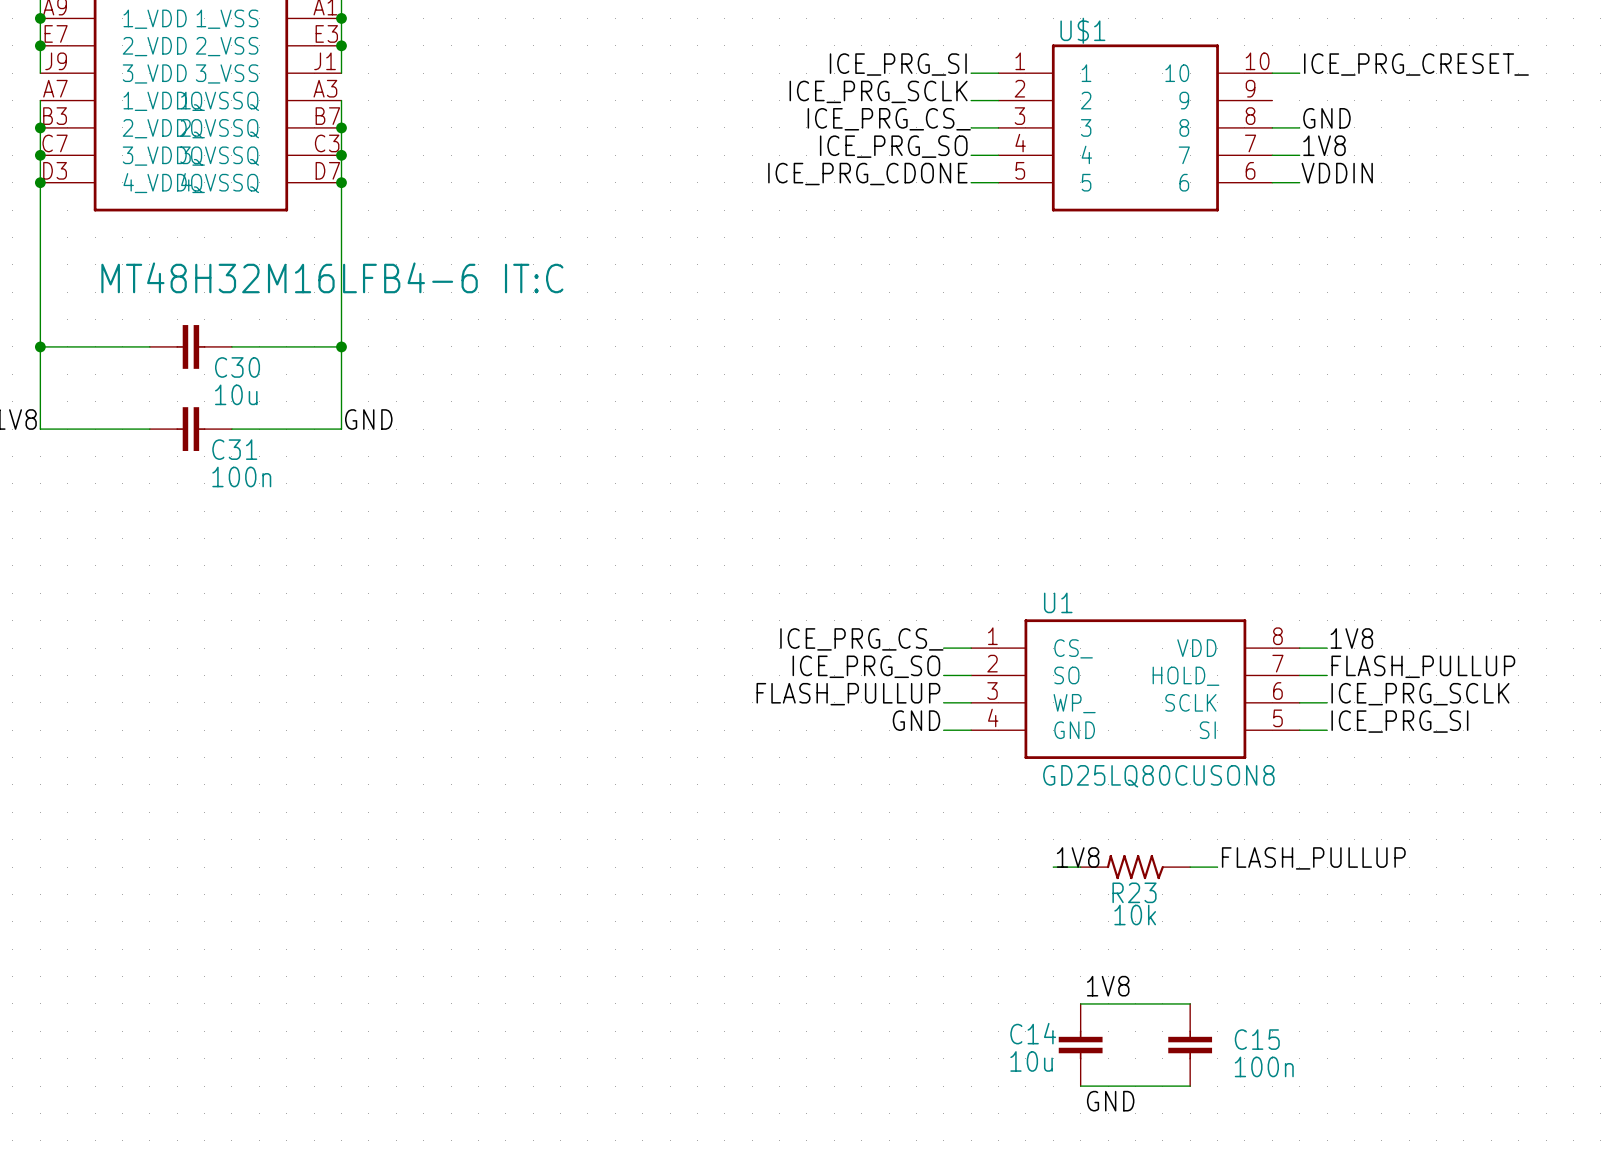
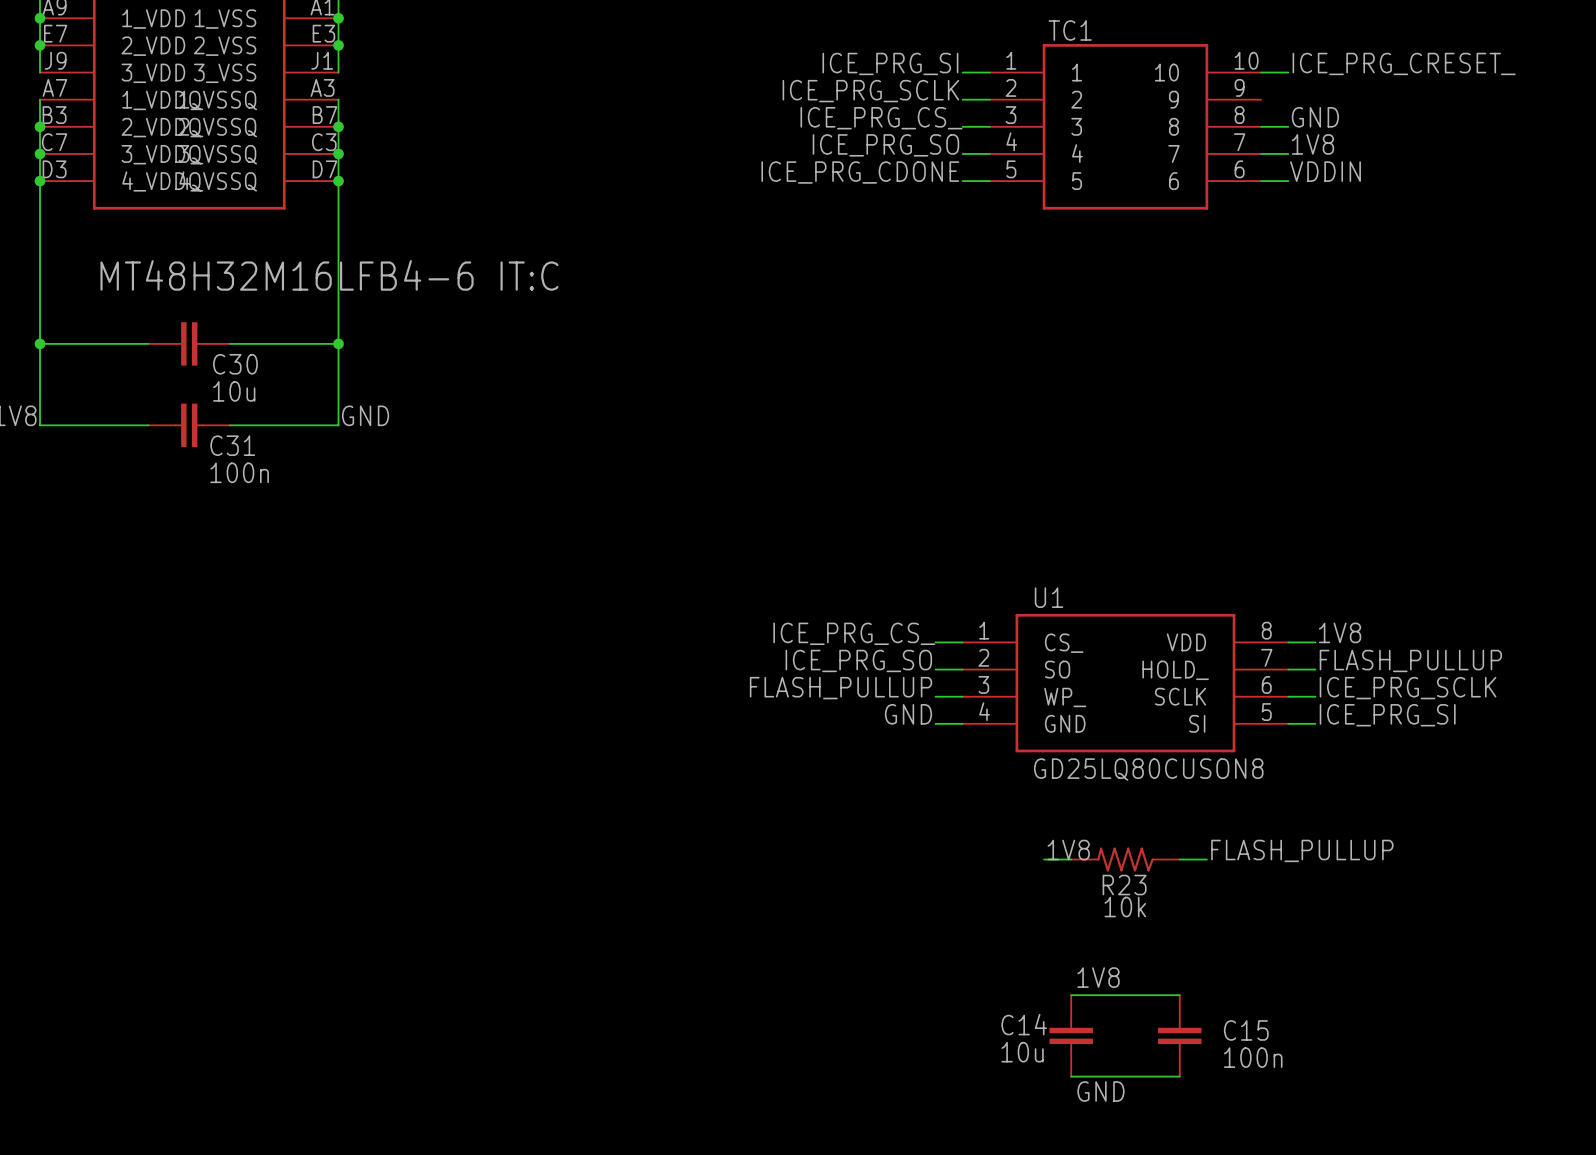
U$1 name: U$1 (1082, 30) -> TC1 (1070, 30)

